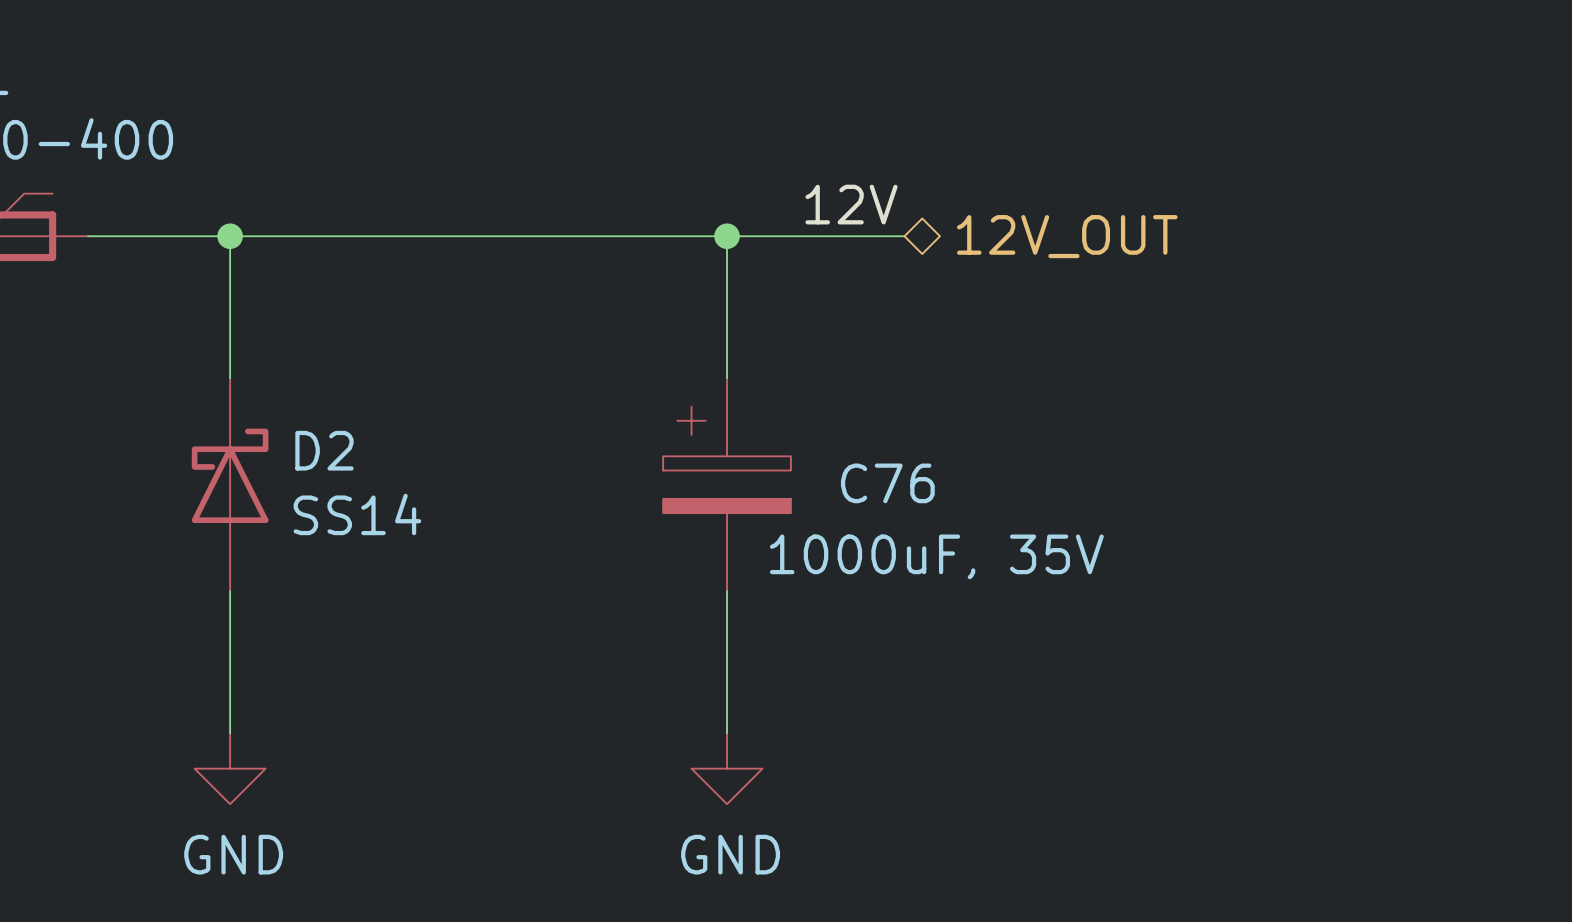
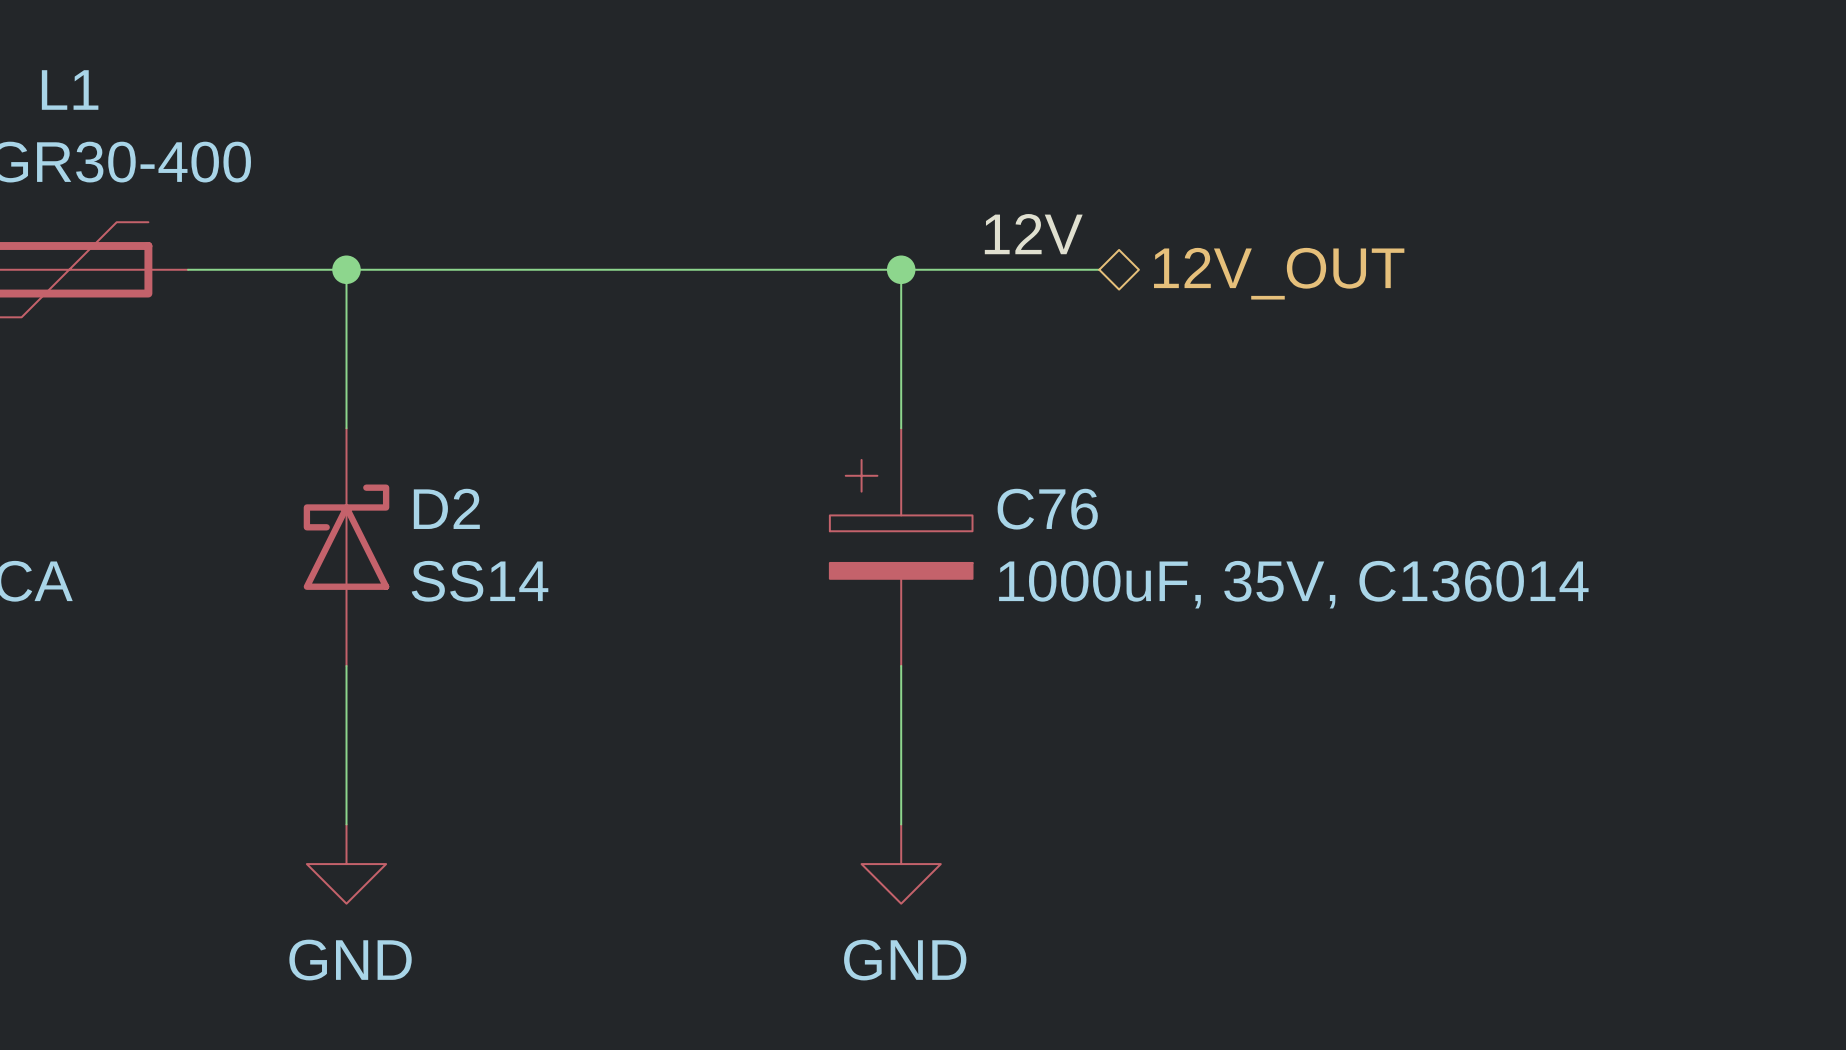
C76 name position: C76 (887, 483) -> C76 (1047, 509)
C76 value: 1000uF, 35V (936, 556) -> 1000uF, 35V, C136014 (1293, 584)

